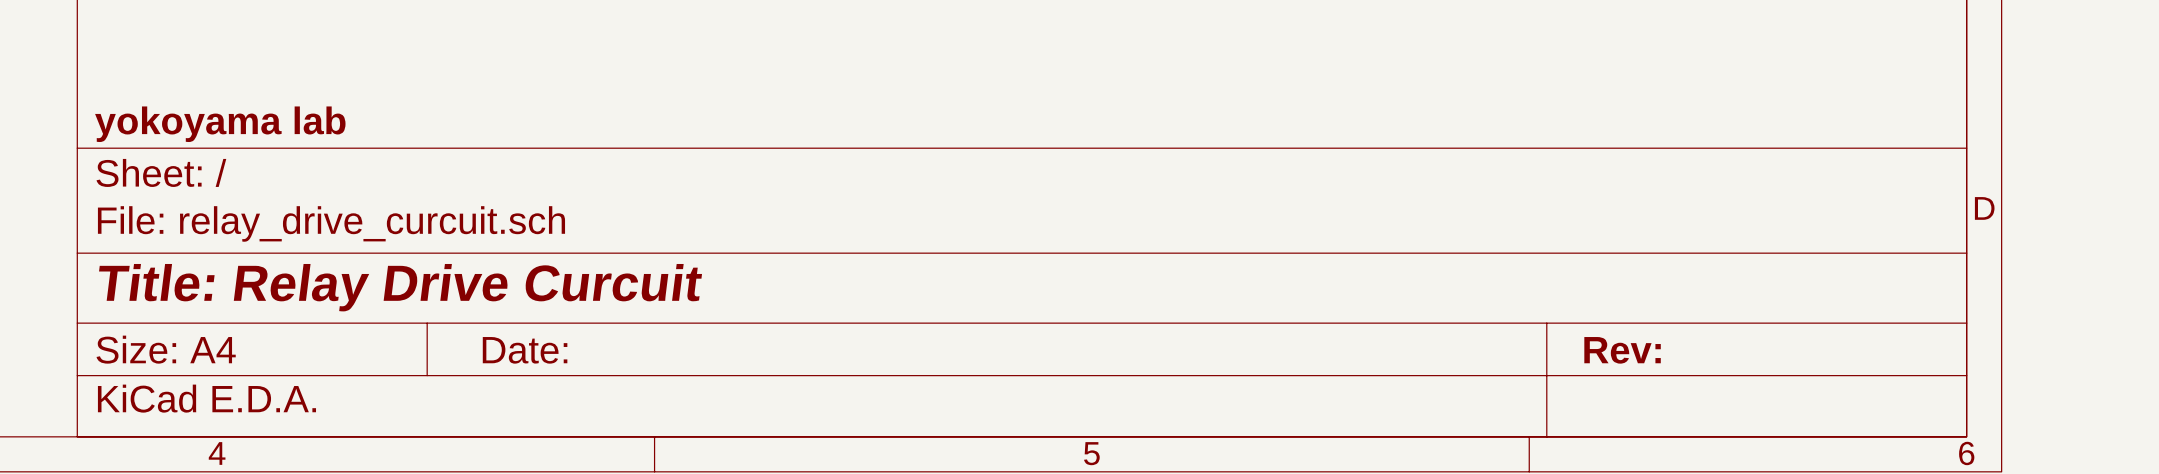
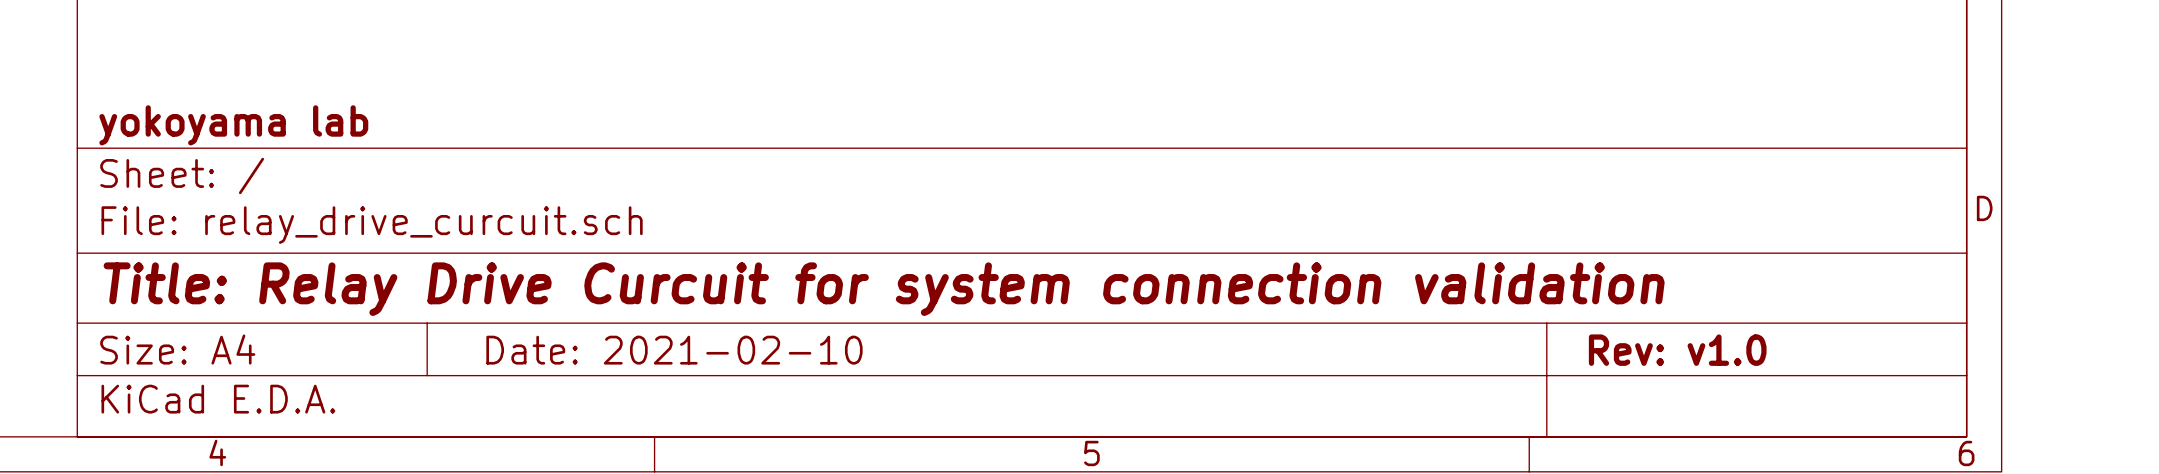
title block: Title: Relay Drive Curcuit (400, 287) -> Title: Relay Drive Curcuit for system connection validation (884, 289)
title block: Date: (525, 350) -> Date: 2021-02-10 (674, 350)
title block: Rev: (1622, 350) -> Rev: v1.0 (1677, 350)

